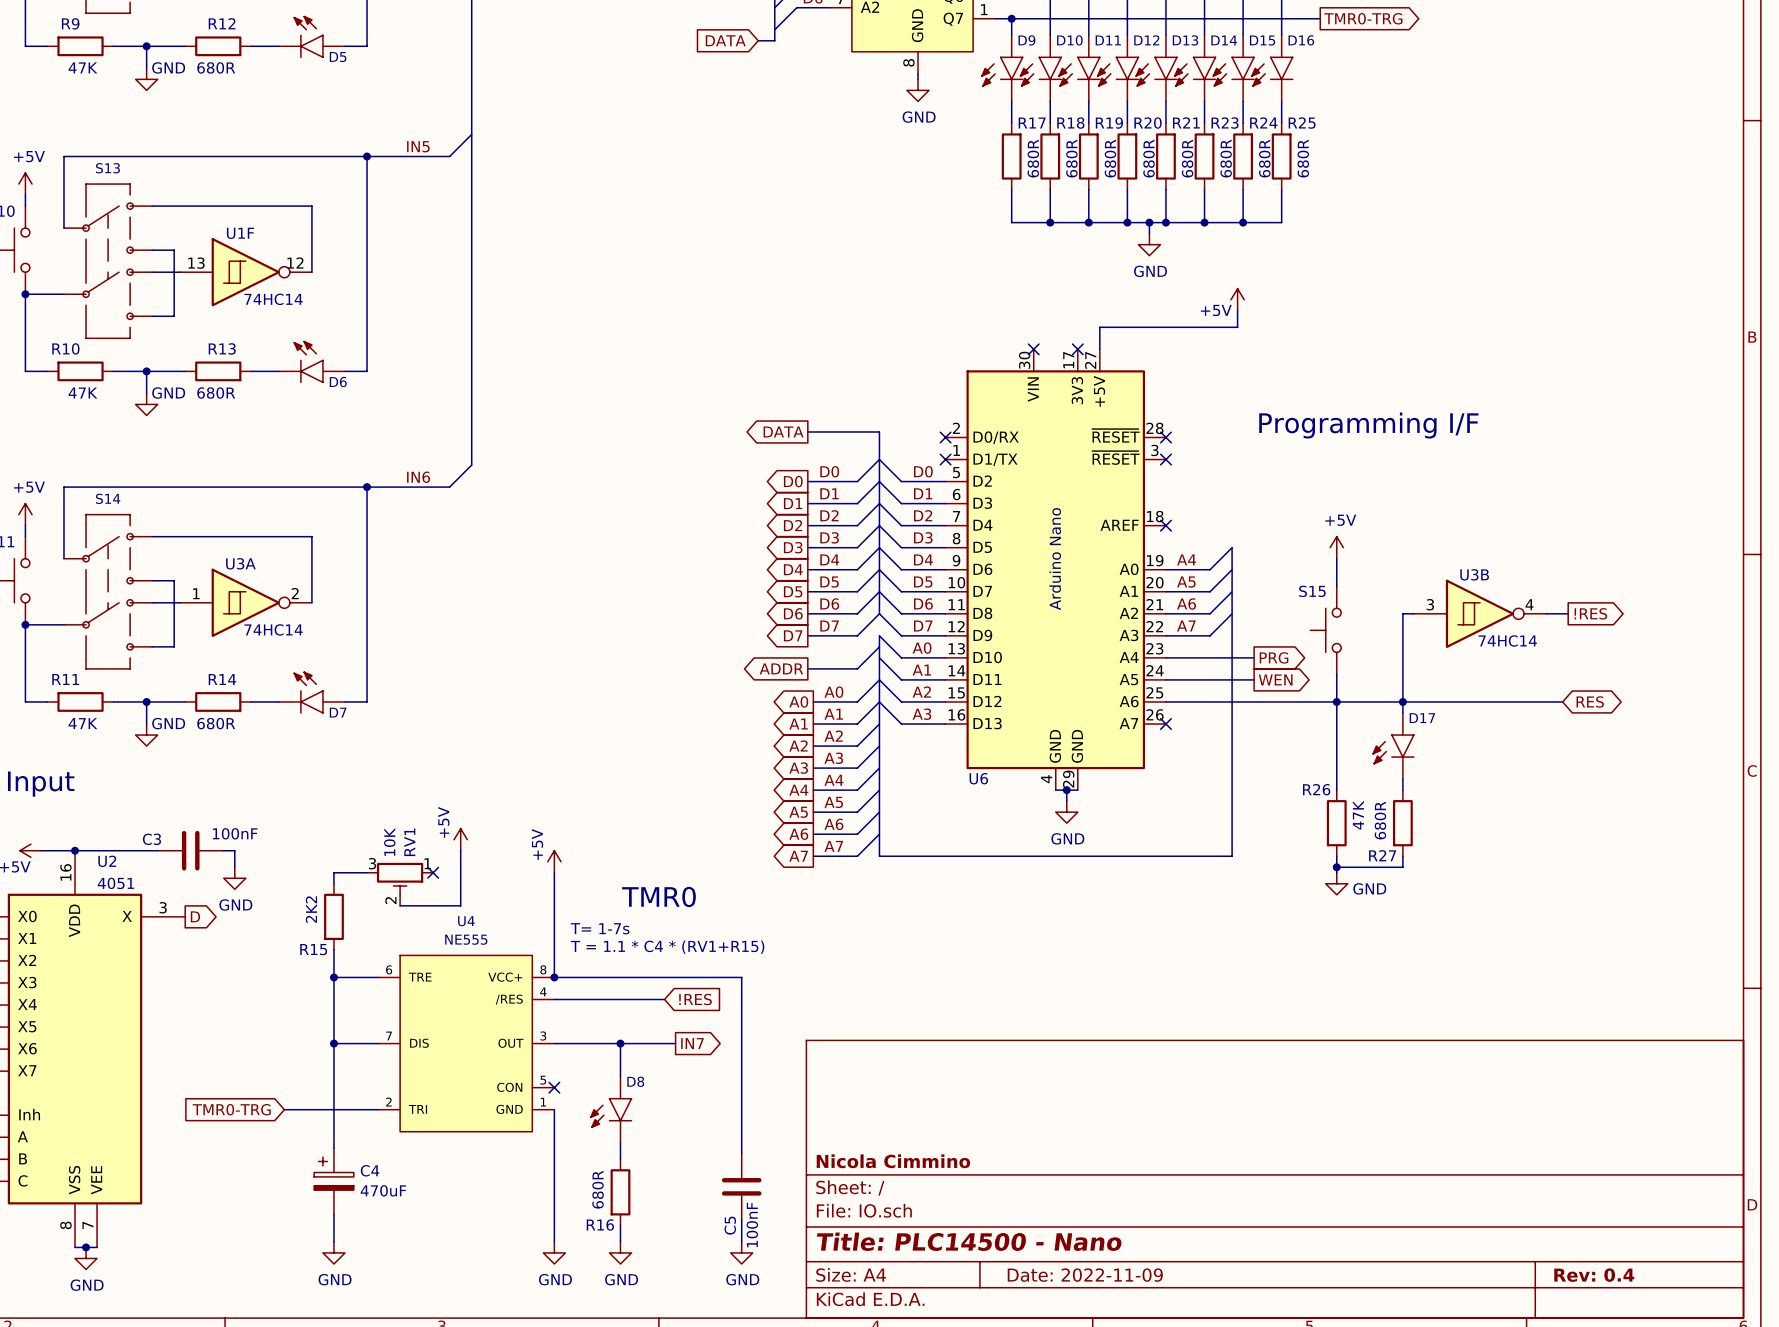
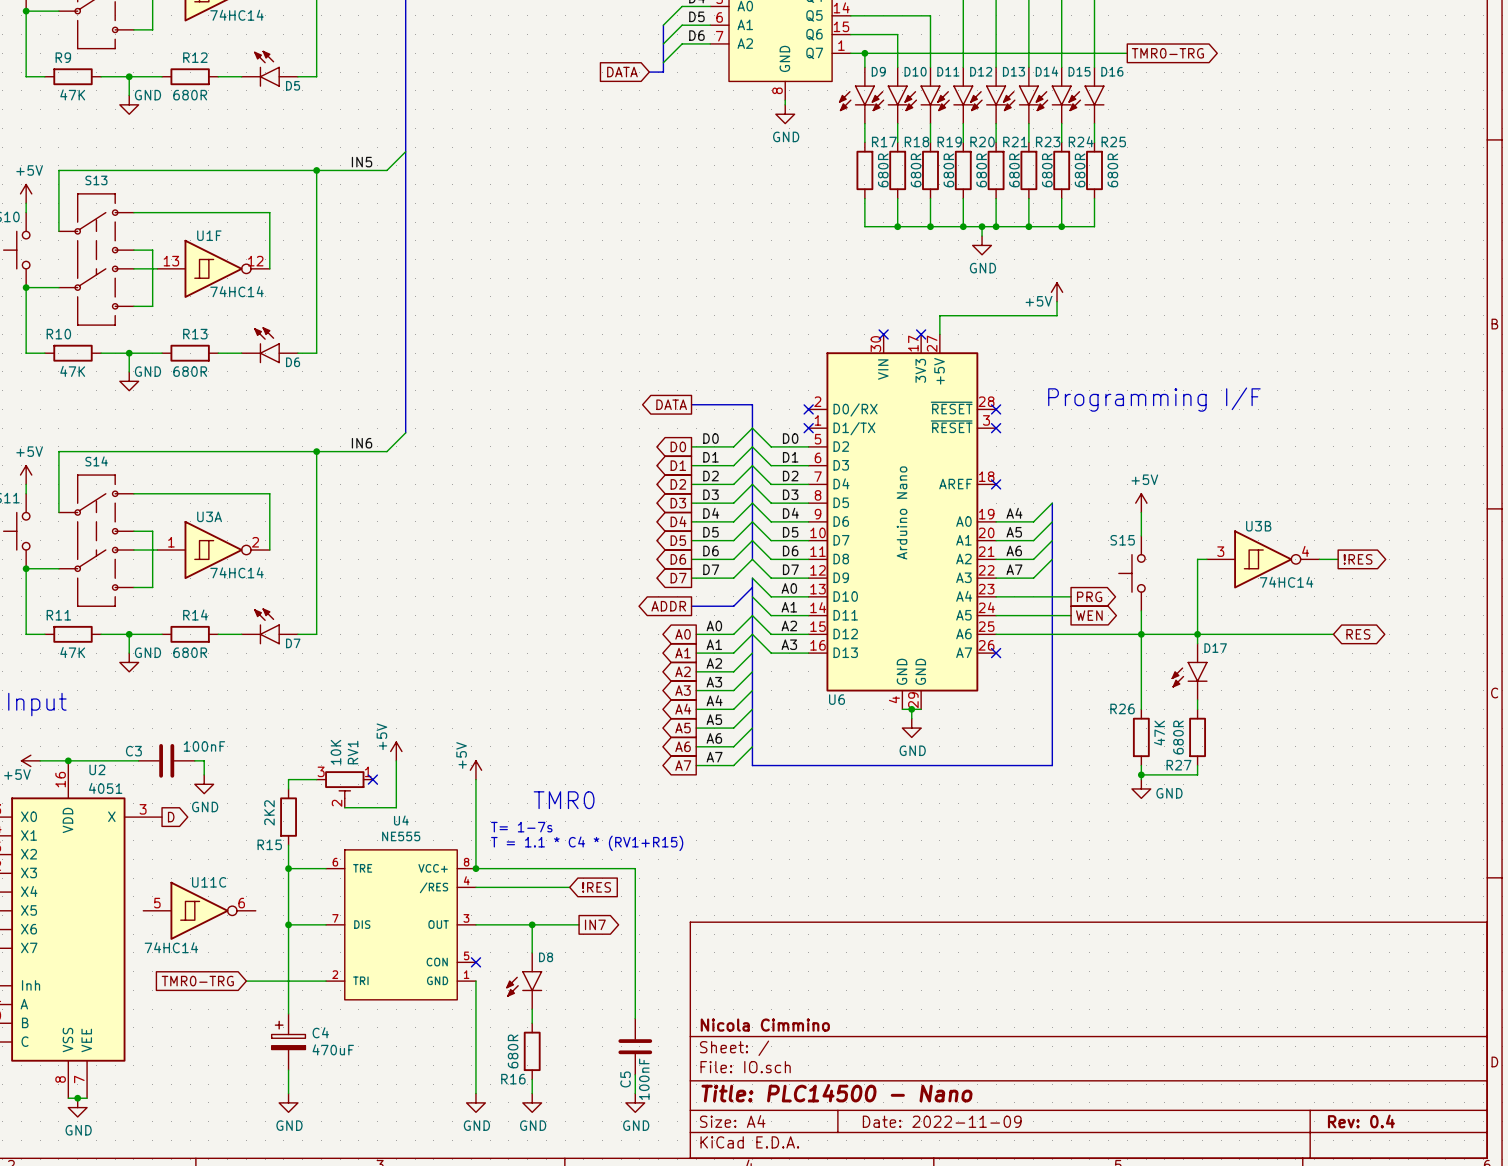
U11C: none -> 74HC14 (199, 910)

